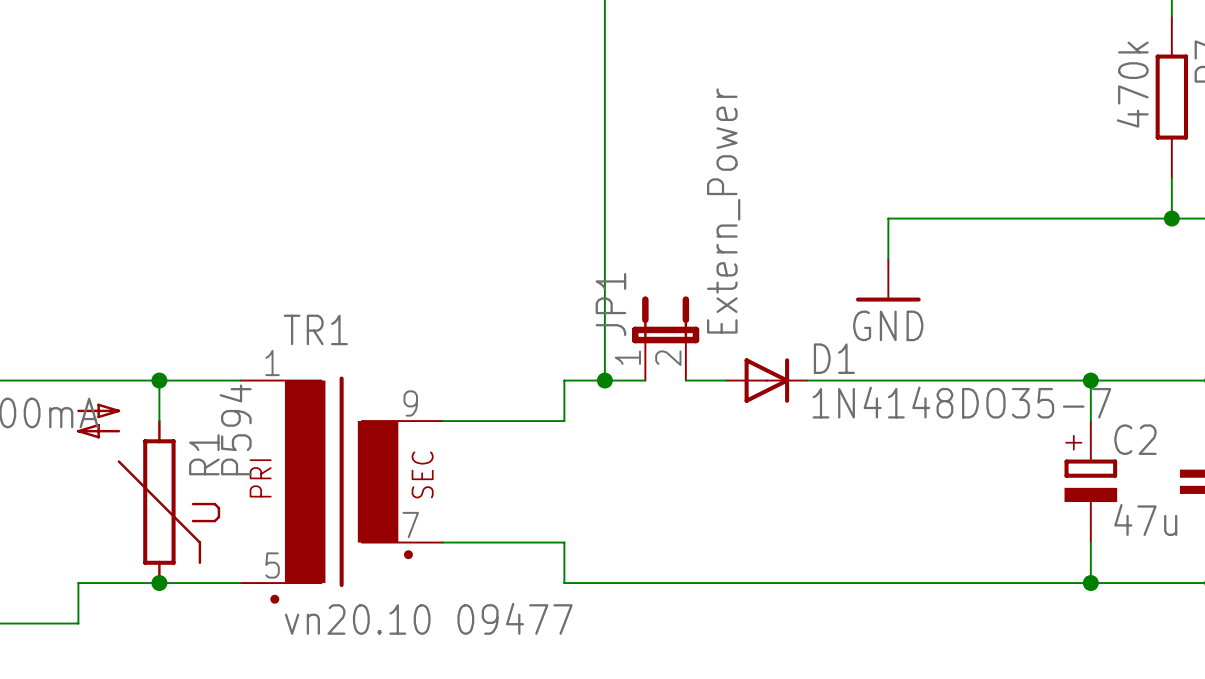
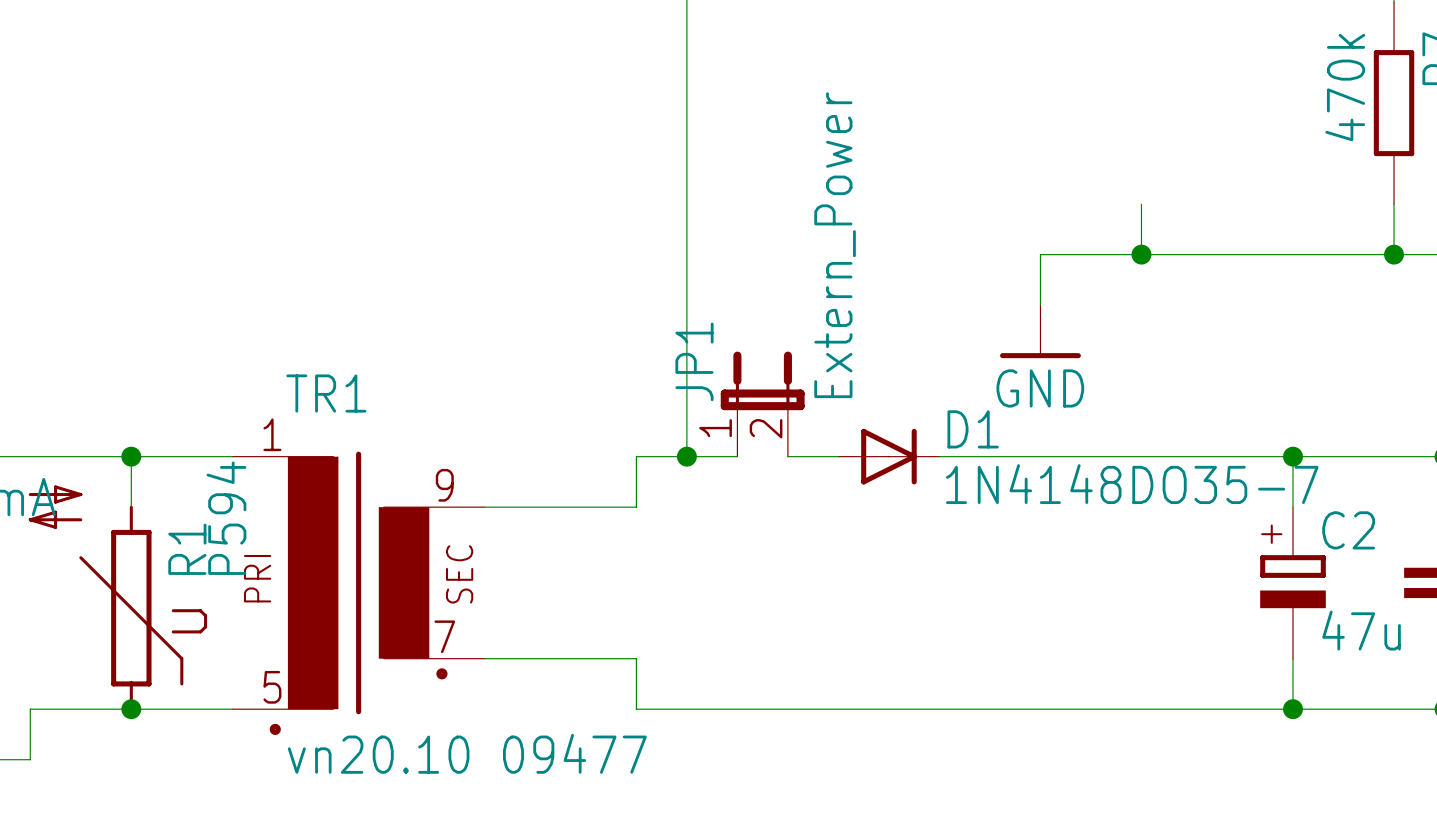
wire: none -> (1141, 204) (1141, 254)
junction: none -> (1141, 254)

